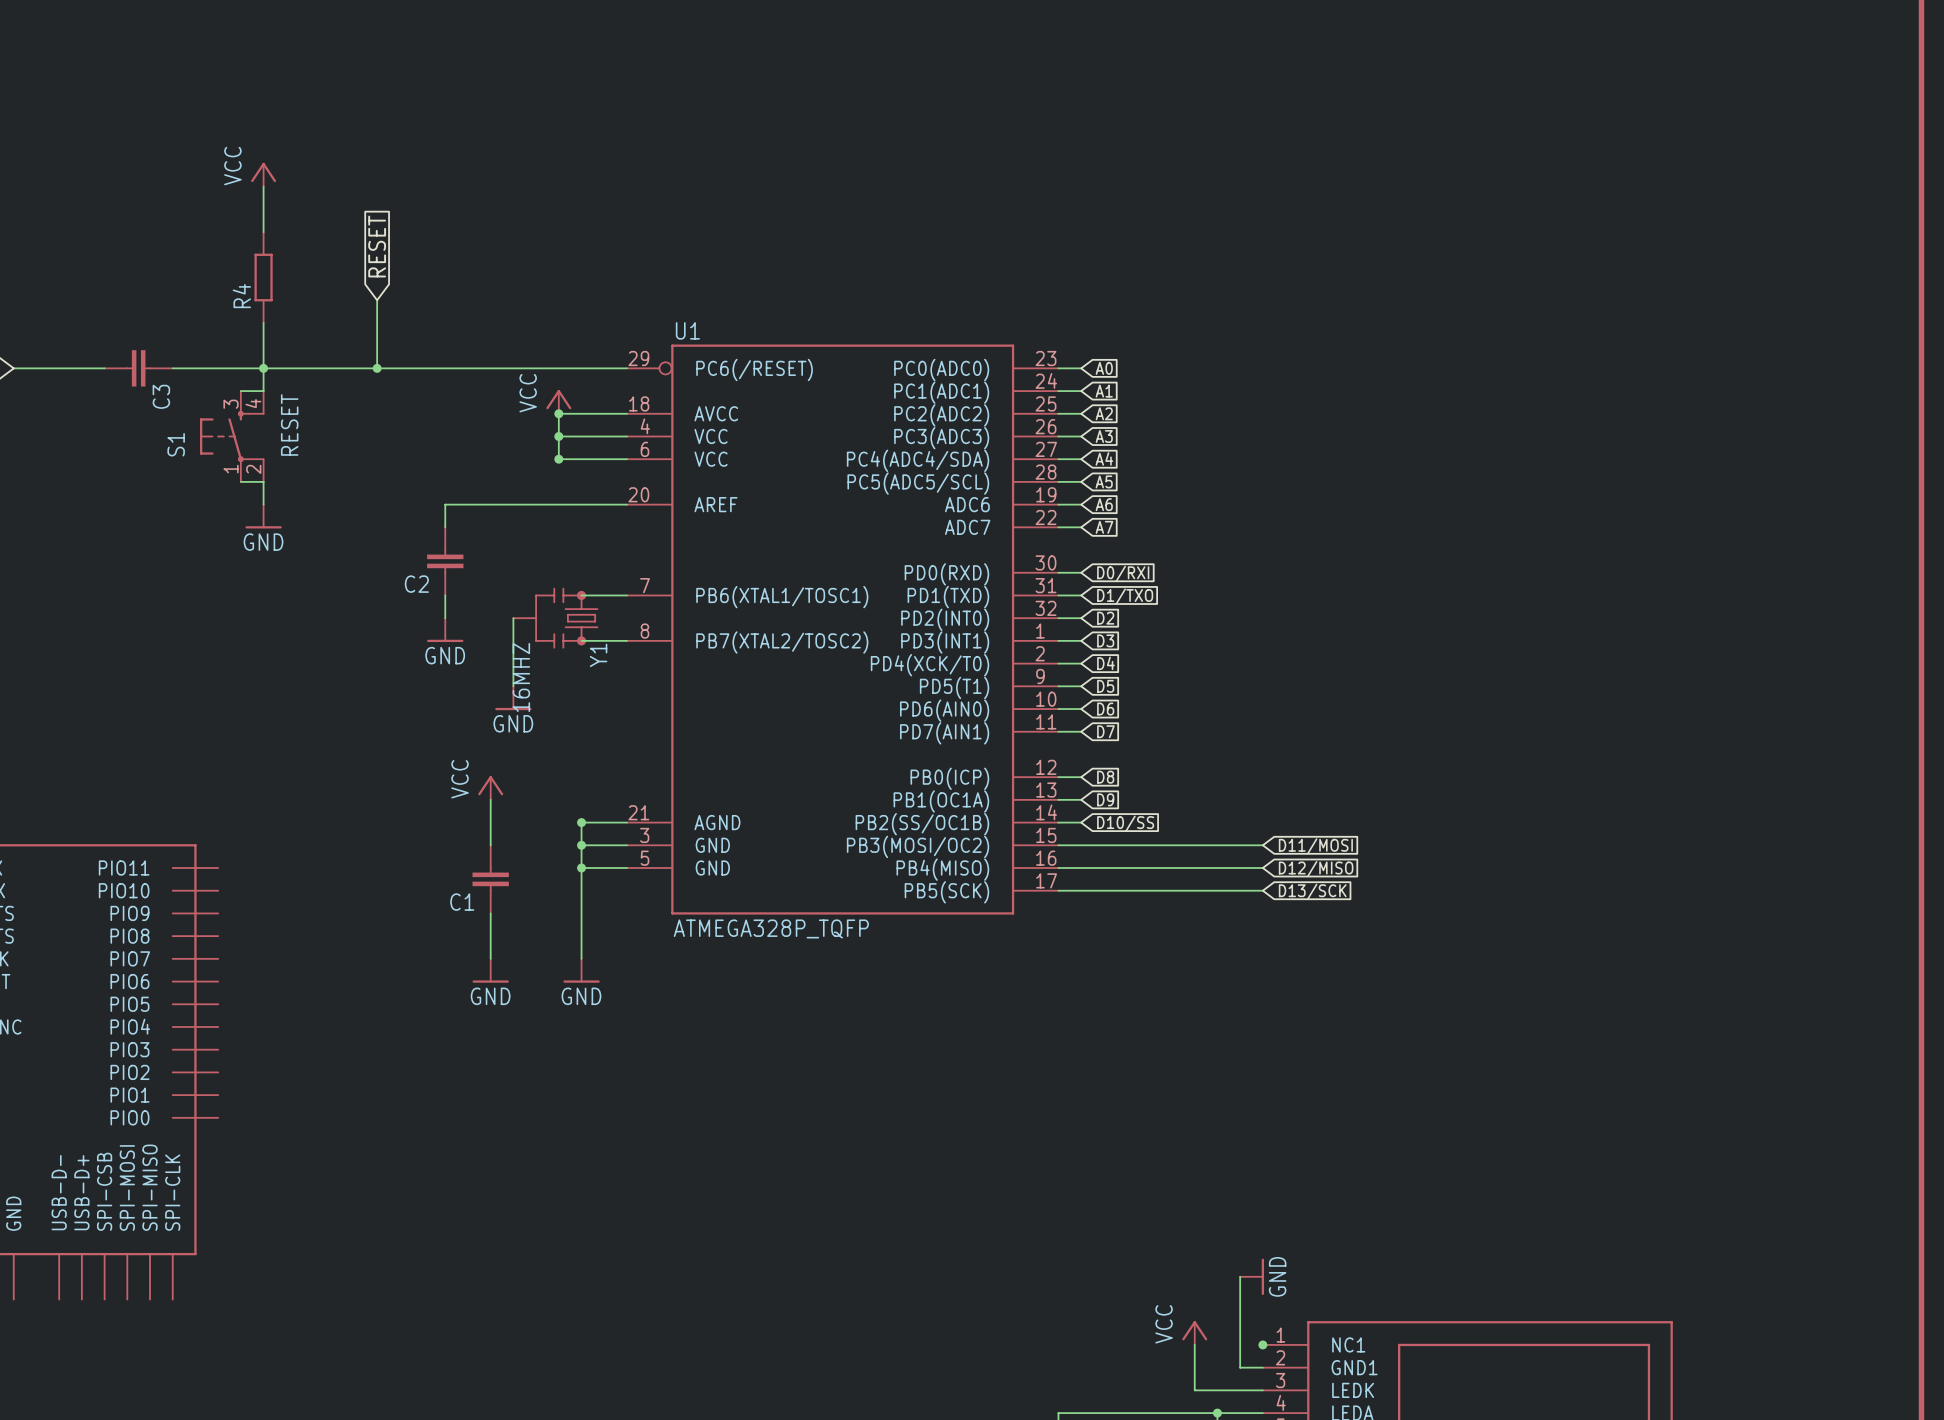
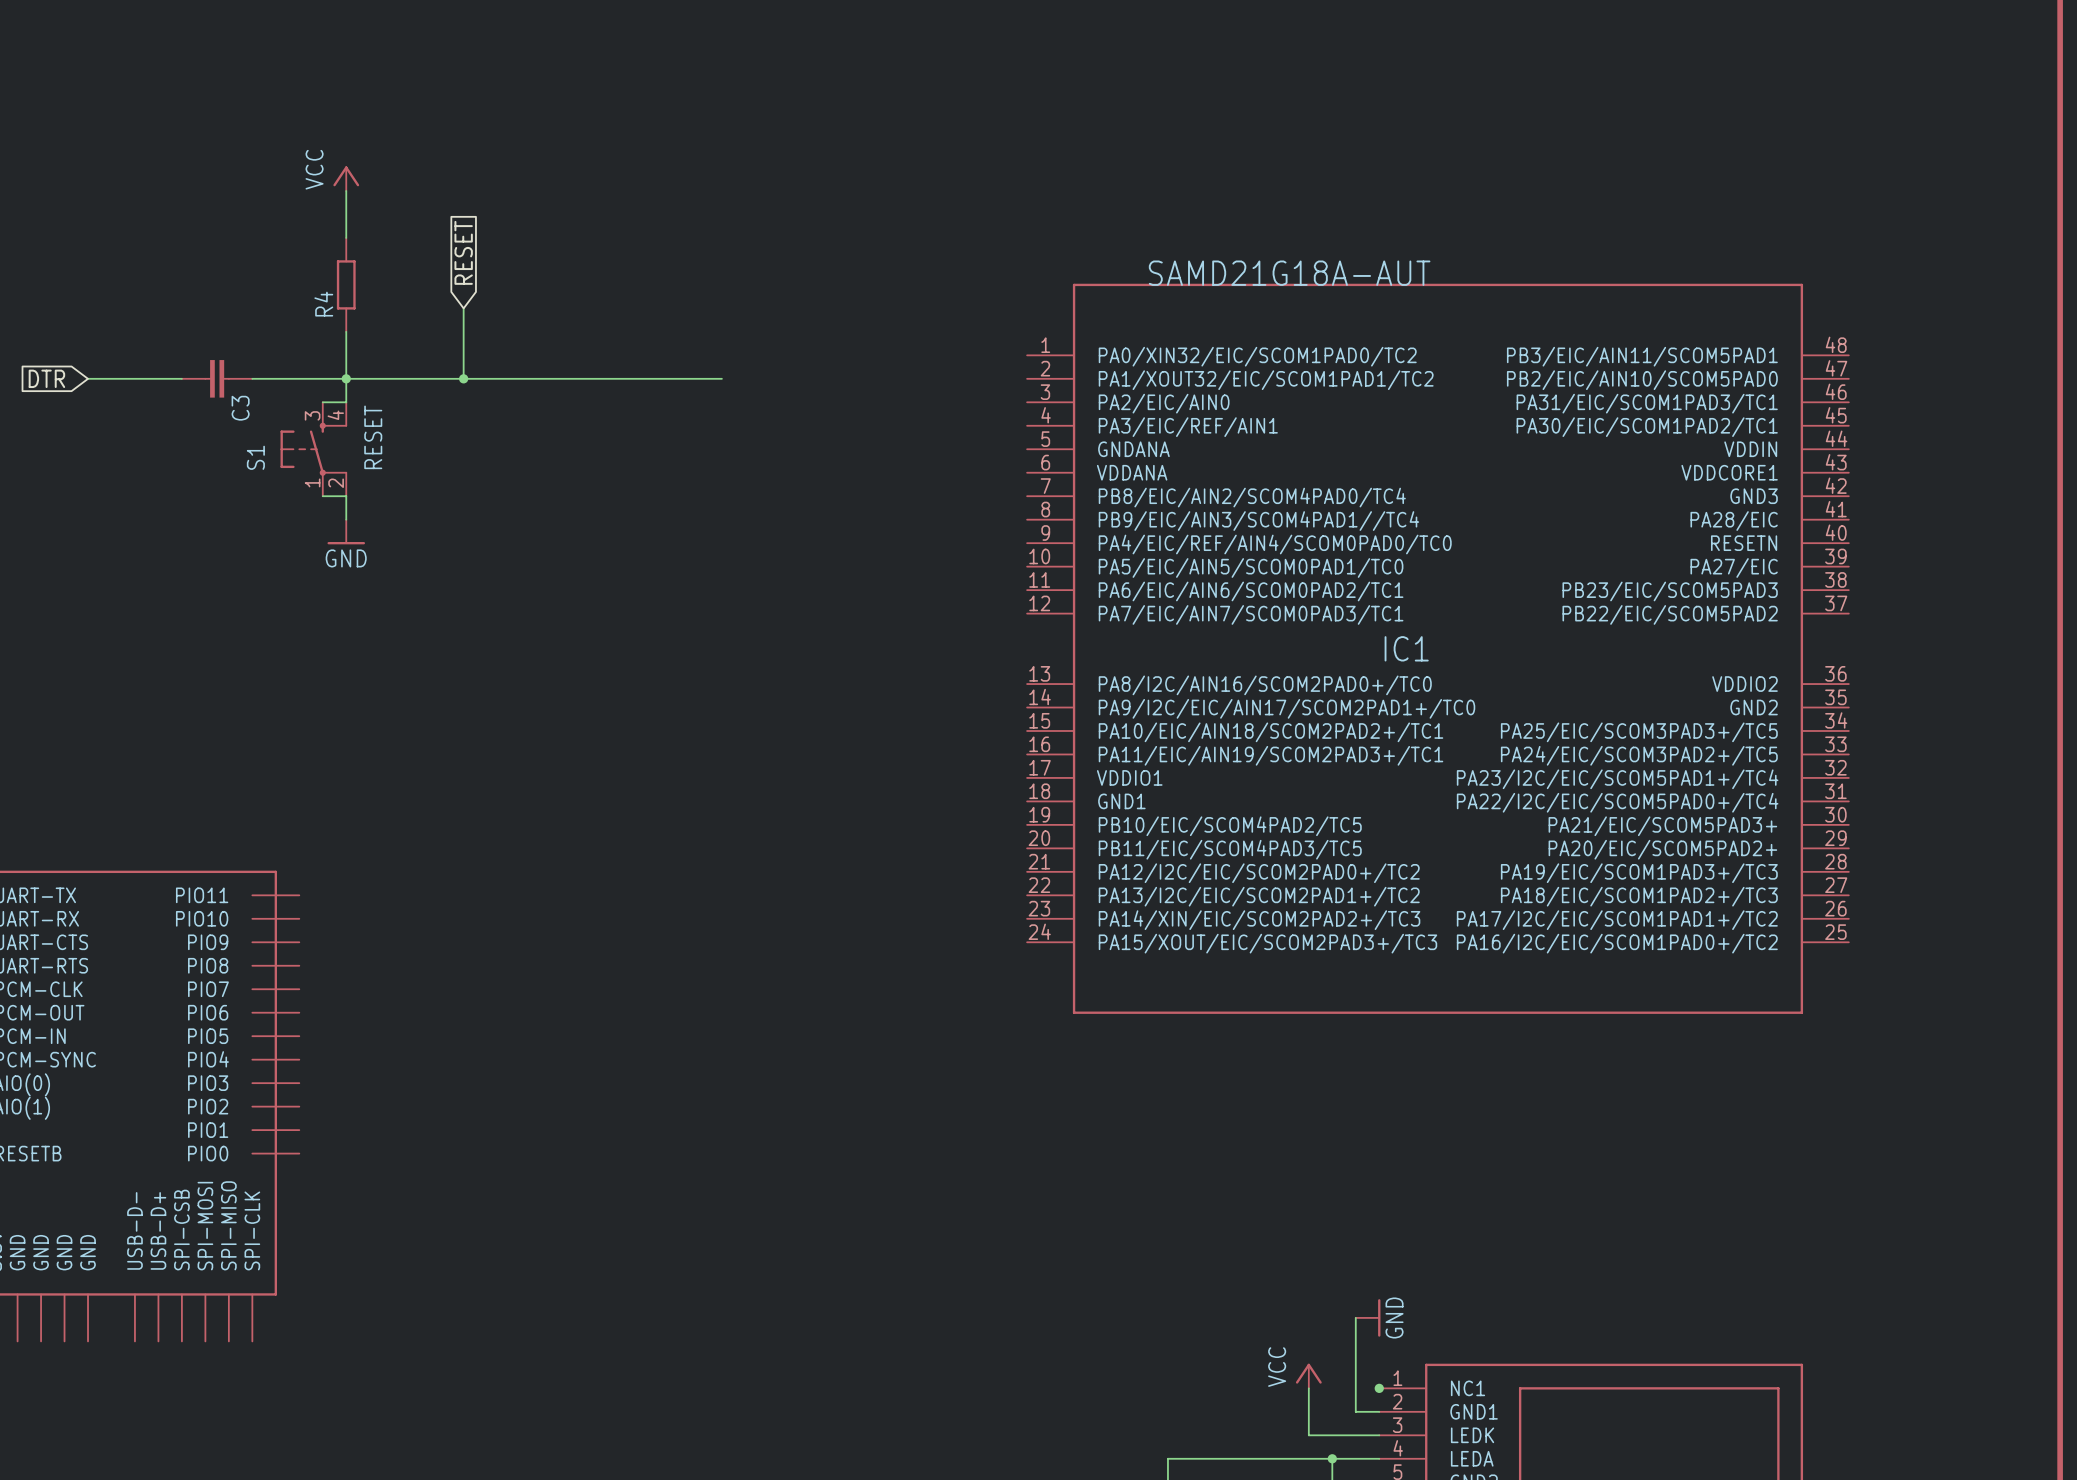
wire: (1058, 368) (1081, 368) -> none
global label: A0 (1104, 368) -> none
wire: (1058, 391) (1081, 391) -> none
global label: A1 (1104, 391) -> none
power symbol: VCC (558, 401) -> none
junction: (558, 413) -> none
wire: (626, 413) (558, 413) (558, 459) (626, 459) -> none
wire: (1058, 413) (1081, 413) -> none
global label: A2 (1104, 413) -> none
wire: (558, 436) (626, 436) -> none
junction: (558, 436) -> none
wire: (1058, 436) (1081, 436) -> none
global label: A3 (1104, 436) -> none
global label: A4 (1104, 458) -> none
junction: (558, 459) -> none
wire: (1058, 459) (1081, 459) -> none
wire: (1058, 481) (1081, 481) -> none
global label: A5 (1104, 481) -> none
wire: (626, 504) (445, 504) (445, 527) -> none
wire: (1058, 504) (1081, 504) -> none
global label: A6 (1104, 504) -> none
wire: (1058, 527) (1081, 527) -> none
global label: A7 (1104, 527) -> none
C2: (445, 561) -> none
wire: (1058, 572) (1081, 572) -> none
global label: D0/RXI (1123, 573) -> none
wire: (445, 595) (445, 618) -> none
wire: (581, 595) (626, 595) -> none
wire: (1058, 595) (1081, 595) -> none
global label: D1/TXO (1125, 596) -> none
wire: (513, 618) (513, 686) -> none
Y1: 16MHZ (555, 618) -> none
wire: (1058, 618) (1081, 618) -> none
global label: D2 (1105, 618) -> none
U1: ATMEGA328P_TQFP (842, 629) -> none
IC1: none -> SAMD21G18A-AUT (1437, 648)
power symbol: GND (445, 630) -> none
wire: (581, 640) (626, 640) -> none
wire: (1058, 640) (1081, 640) -> none
global label: D3 (1105, 640) -> none
wire: (1058, 663) (1081, 663) -> none
global label: D4 (1105, 663) -> none
wire: (1058, 686) (1081, 686) -> none
global label: D5 (1105, 686) -> none
power symbol: GND (513, 698) -> none
wire: (1058, 709) (1081, 709) -> none
global label: D6 (1105, 709) -> none
wire: (1058, 731) (1081, 731) -> none
global label: D7 (1105, 731) -> none
wire: (1058, 777) (1081, 777) -> none
global label: D8 (1105, 777) -> none
power symbol: VCC (490, 787) -> none
wire: (490, 799) (490, 845) -> none
wire: (1058, 799) (1081, 799) -> none
global label: D9 (1105, 799) -> none
junction: (581, 822) -> none
wire: (626, 822) (581, 822) (581, 958) -> none
wire: (1058, 822) (1081, 822) -> none
global label: D10/SS (1125, 823) -> none
wire: (581, 845) (626, 845) -> none
junction: (581, 845) -> none
wire: (1058, 845) (1262, 845) -> none
global label: D11/MOSI (1315, 846) -> none
wire: (581, 868) (626, 868) -> none
junction: (581, 868) -> none
wire: (1058, 868) (1262, 868) -> none
global label: D12/MISO (1316, 869) -> none
C1: (490, 879) -> none
wire: (1058, 890) (1262, 890) -> none
global label: D13/SCK (1312, 891) -> none
wire: (490, 913) (490, 958) -> none
power symbol: GND (490, 970) -> none
power symbol: GND (581, 970) -> none

